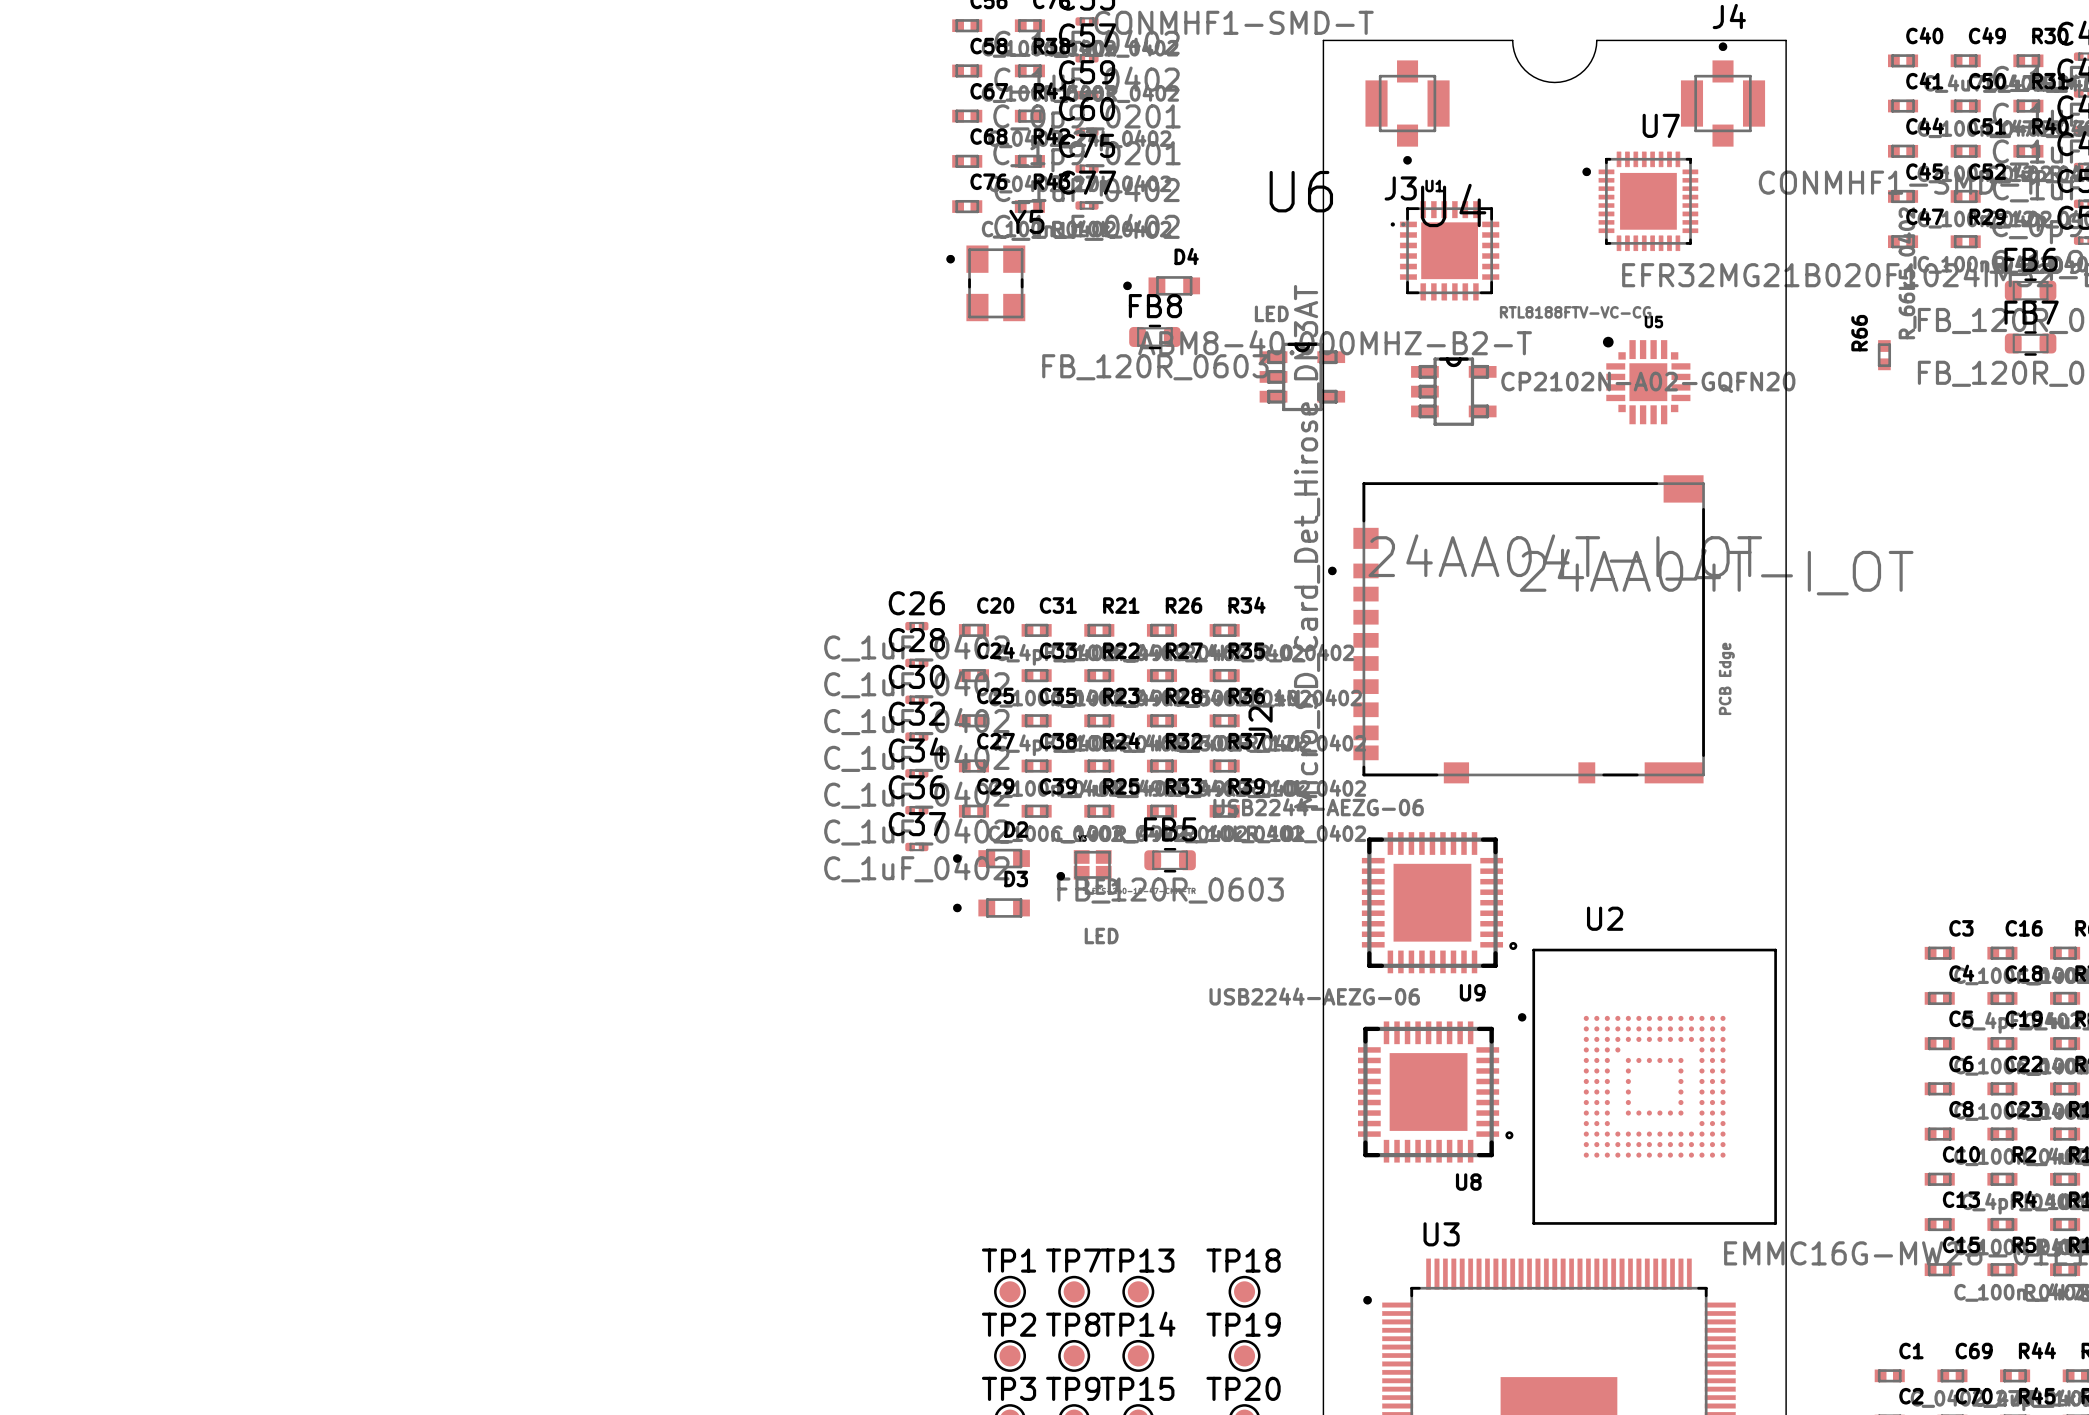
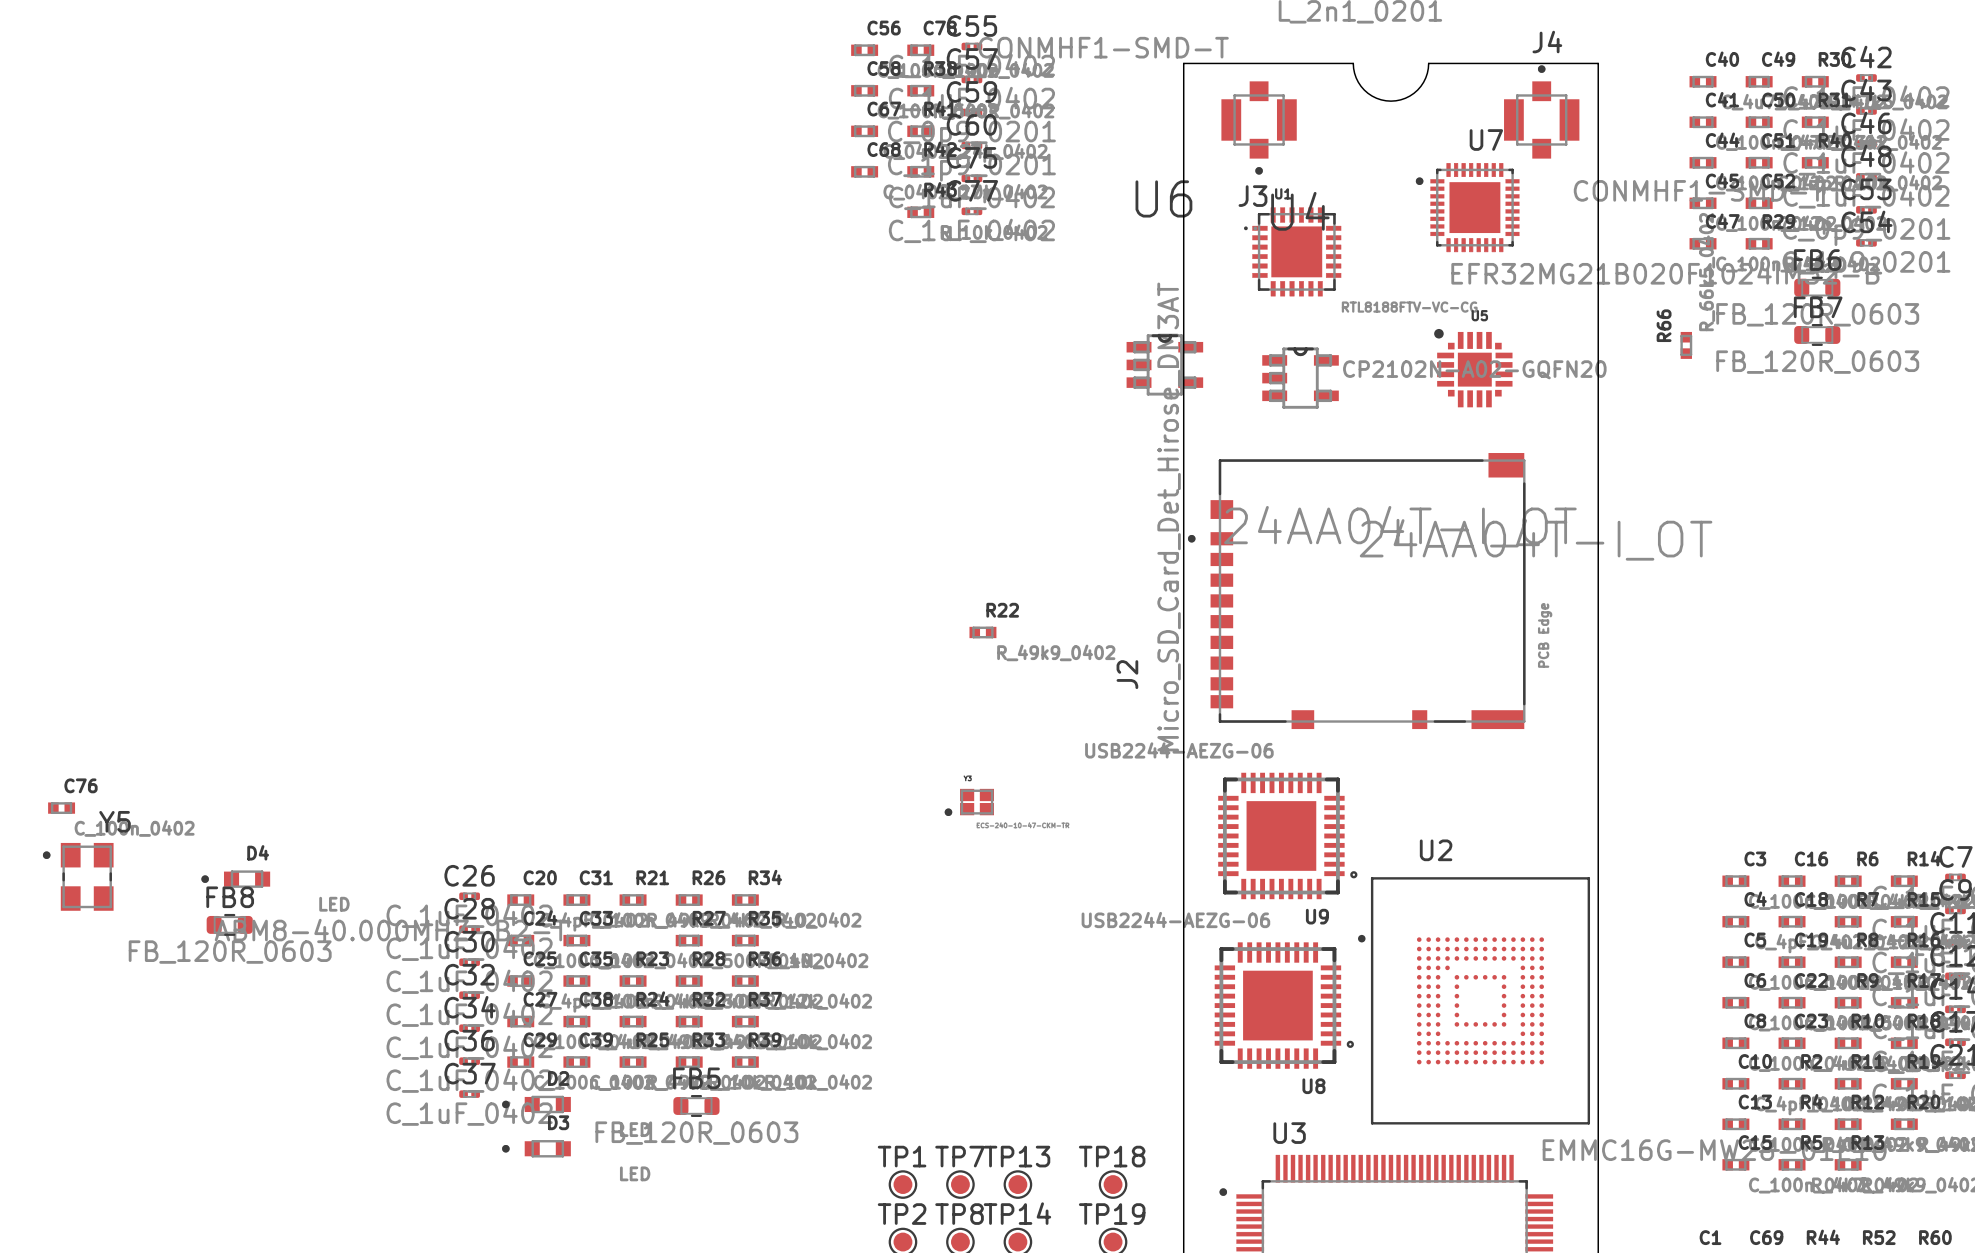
C76 position: (967, 206) -> (61, 808)
Y5 position: (985, 283) -> (78, 876)
D4 position: (1161, 285) -> (235, 879)
FB8 position: (1154, 336) -> (229, 924)
C26 position: (916, 626) -> (469, 896)
C20 position: (973, 630) -> (520, 900)
C31 position: (1036, 630) -> (576, 900)
R21 position: (1099, 630) -> (633, 900)
R26 position: (1161, 630) -> (689, 900)
R34 position: (1224, 630) -> (745, 900)
C28 position: (916, 662) -> (469, 929)
C24 position: (973, 675) -> (520, 940)
C33 position: (1036, 675) -> (576, 940)
R27 position: (1161, 675) -> (689, 940)
R35 position: (1224, 675) -> (745, 940)
C30 position: (916, 699) -> (469, 962)
C25 position: (973, 720) -> (520, 981)
C35 position: (1036, 720) -> (576, 981)
R23 position: (1099, 720) -> (633, 981)
R28 position: (1161, 720) -> (689, 981)
R36 position: (1224, 720) -> (745, 981)
C32 position: (916, 736) -> (469, 995)
C27 position: (973, 766) -> (520, 1021)
C38 position: (1036, 766) -> (576, 1021)
R24 position: (1099, 766) -> (633, 1021)
R32 position: (1161, 766) -> (689, 1021)
R37 position: (1224, 766) -> (745, 1021)
C34 position: (916, 773) -> (469, 1028)
C36 position: (916, 810) -> (469, 1061)
C29 position: (973, 811) -> (520, 1062)
C39 position: (1036, 811) -> (576, 1062)
R25 position: (1099, 811) -> (633, 1062)
R33 position: (1161, 811) -> (689, 1062)
R39 position: (1224, 811) -> (745, 1062)
C37 position: (916, 846) -> (469, 1094)
D2 position: (991, 858) -> (536, 1104)
FB5 position: (1170, 860) -> (696, 1105)
D3 position: (991, 907) -> (536, 1148)

